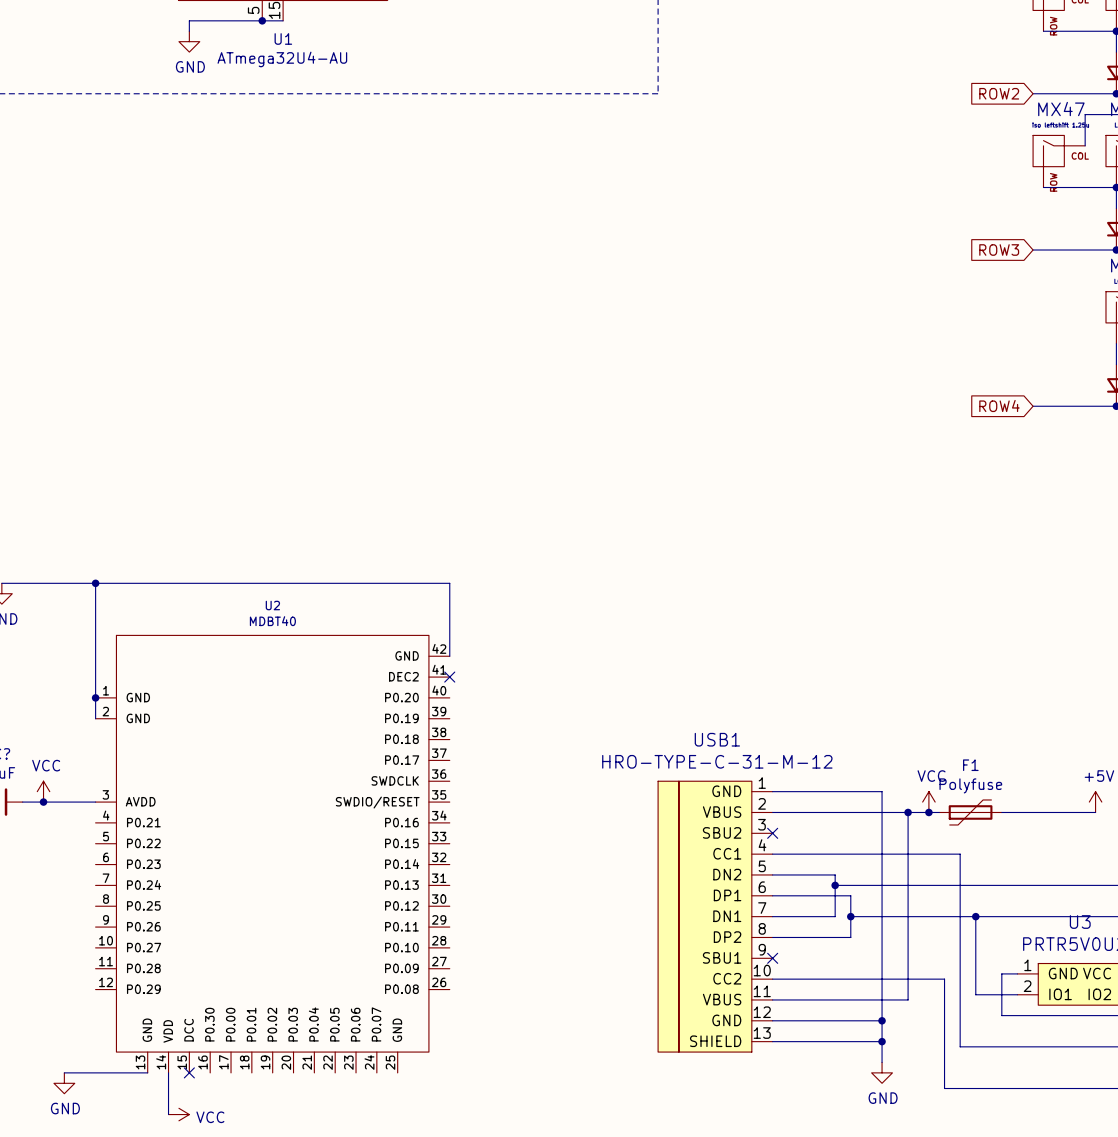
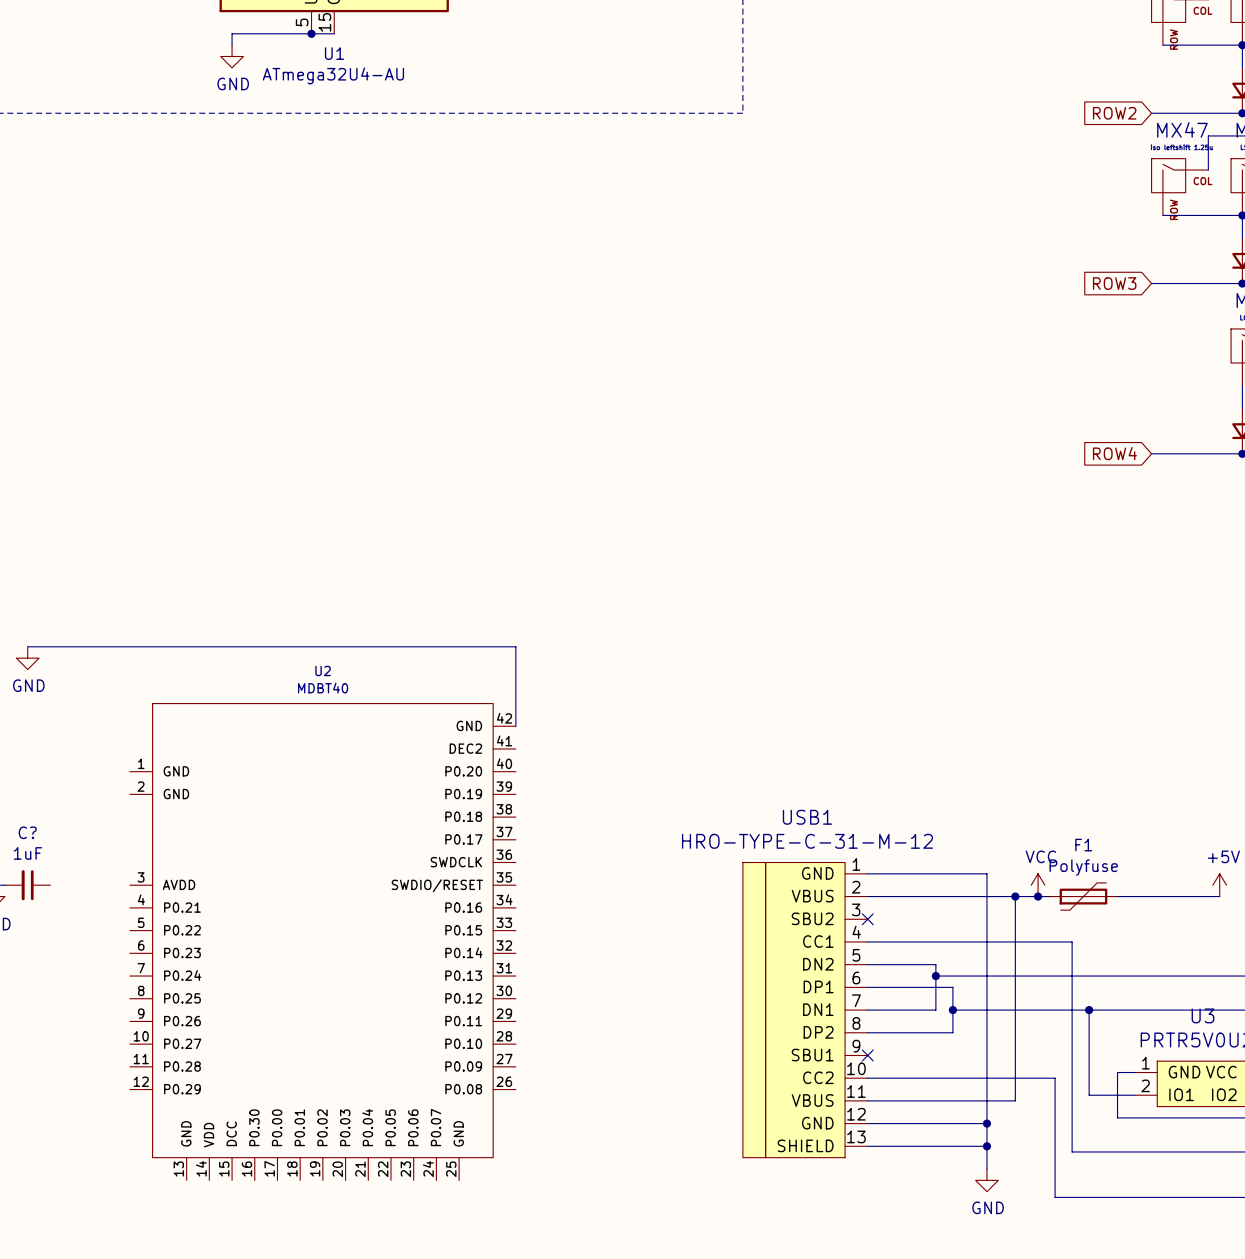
wire: (95, 583) (95, 718) -> none
junction: (95, 583) -> none
no-connect mark: (449, 677) -> none
junction: (95, 697) -> none
power symbol: VCC (43, 791) -> none
wire: (22, 802) (95, 802) -> none
junction: (43, 802) -> none
wire: (64, 1072) (147, 1072) -> none
wire: (168, 1072) (168, 1114) -> none
no-connect mark: (189, 1072) -> none
power symbol: GND (64, 1083) -> none
power symbol: VCC (178, 1114) -> none

